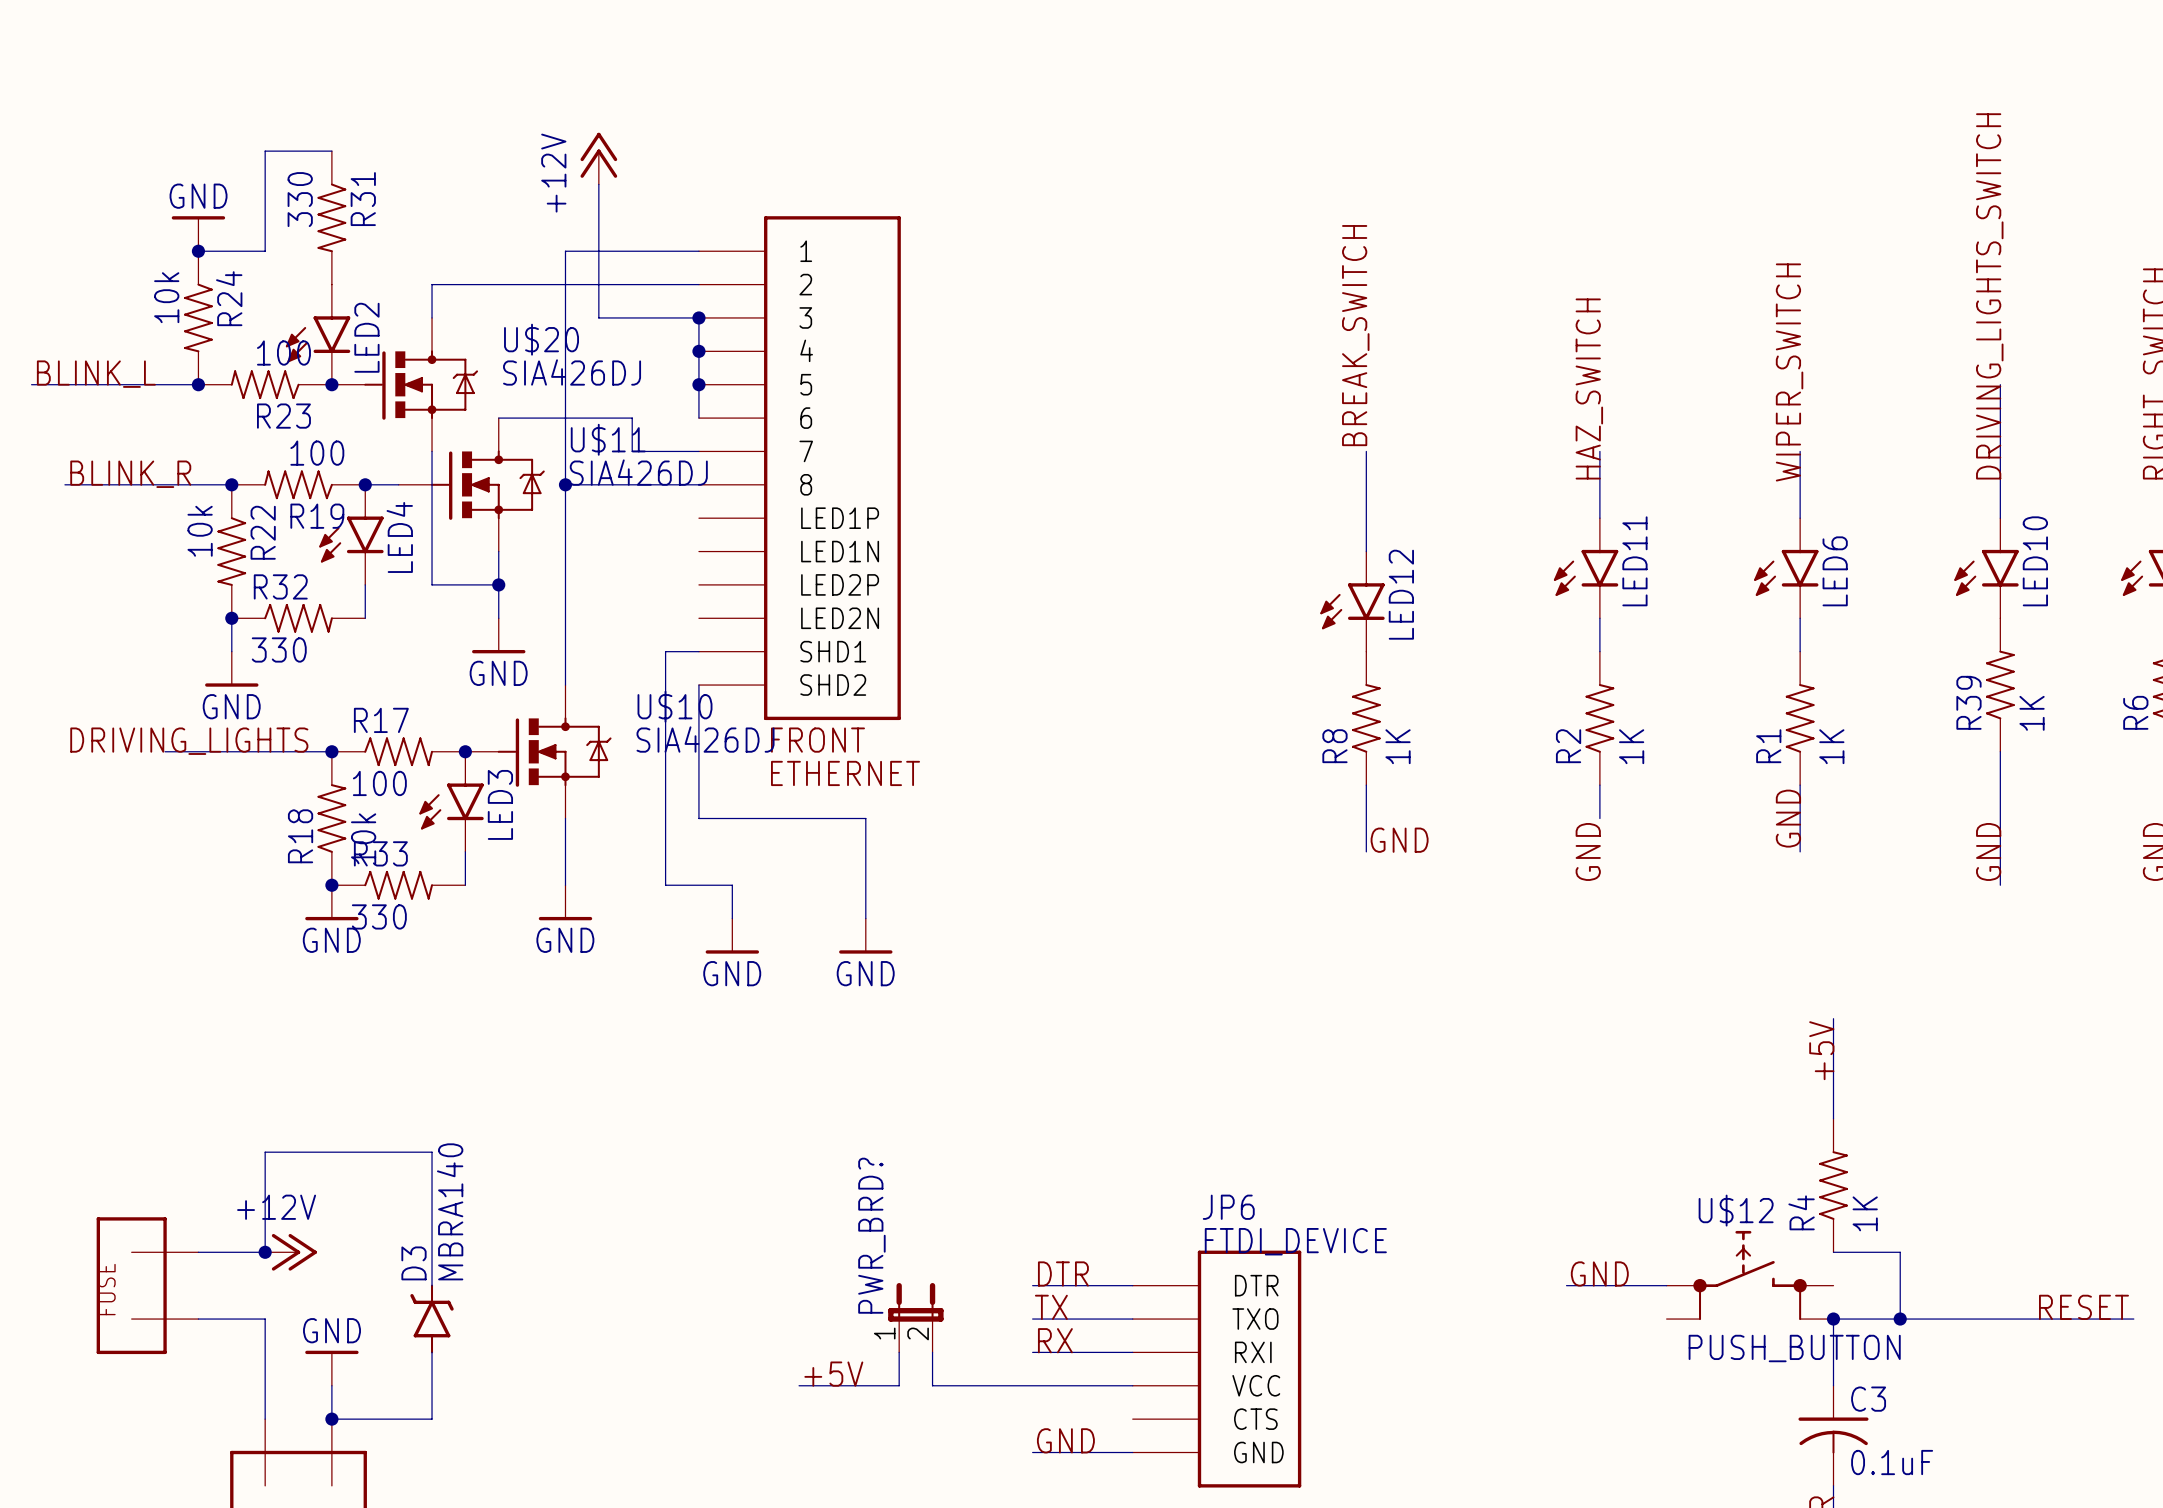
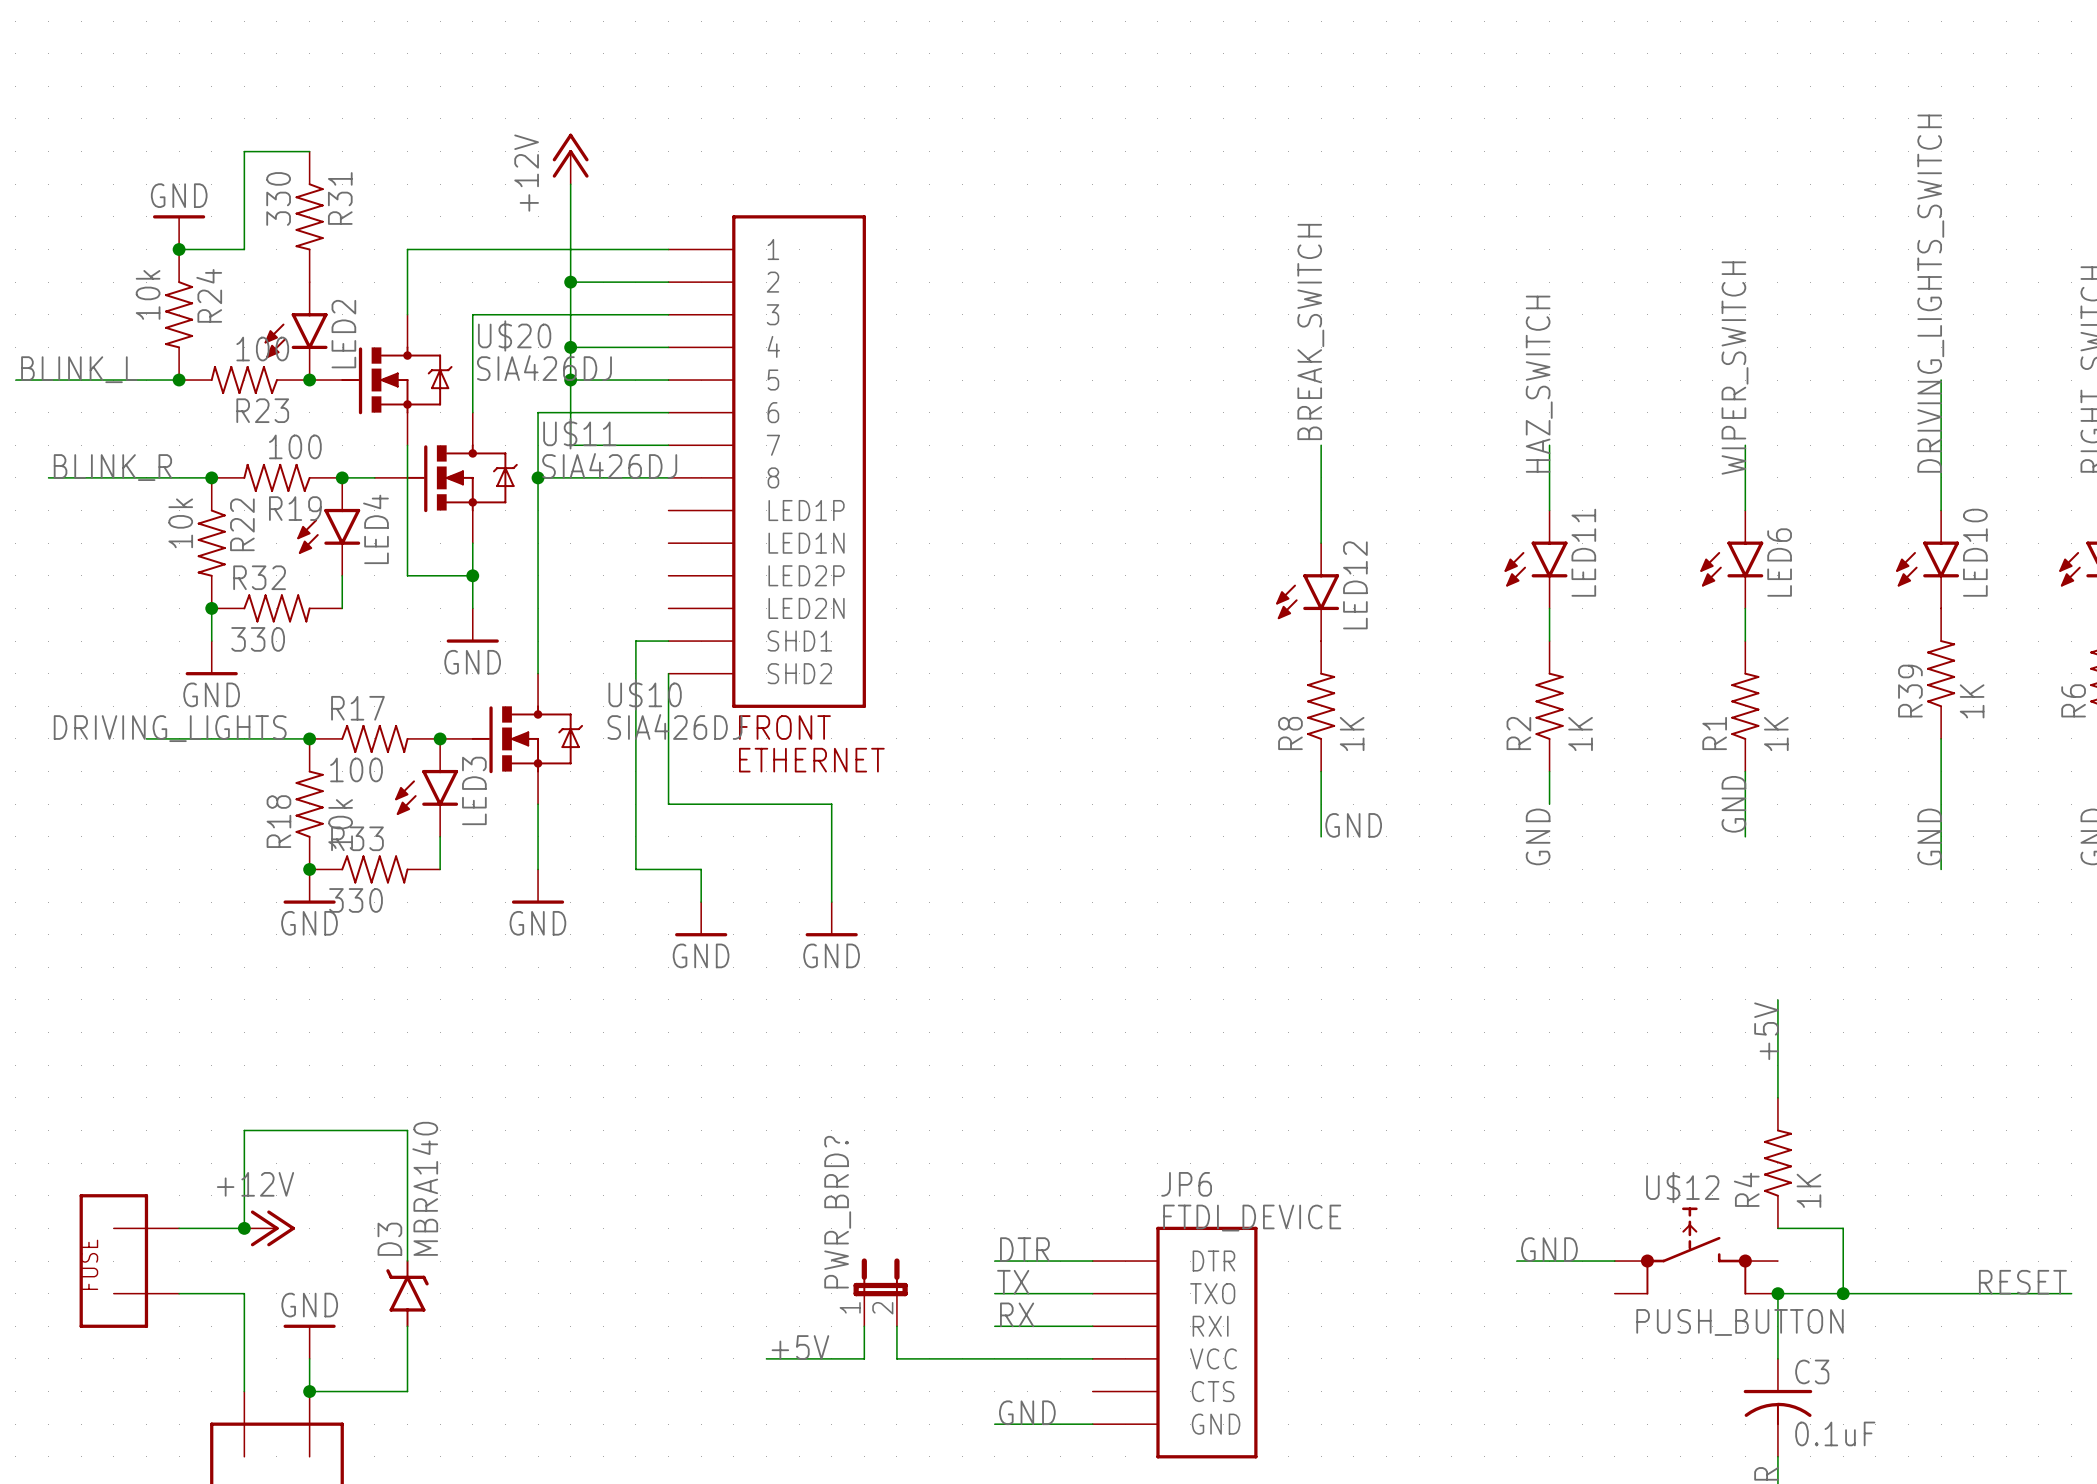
wire: (565, 251) (565, 418) (498, 418) -> (603, 445) (570, 445) (570, 314) (472, 314) (472, 412)
wire: (432, 284) (598, 284) -> (407, 282) (407, 249) (538, 249)
junction: none -> (570, 282)
wire: (698, 317) (698, 418) -> none
junction: (698, 317) -> none
wire: none -> (570, 347) (668, 347)
junction: none -> (570, 347)
junction: (698, 351) -> none
wire: none -> (570, 380) (668, 380)
junction: none -> (570, 380)
junction: (698, 384) -> none
wire: (632, 418) (632, 451) -> (603, 412) (668, 412)

